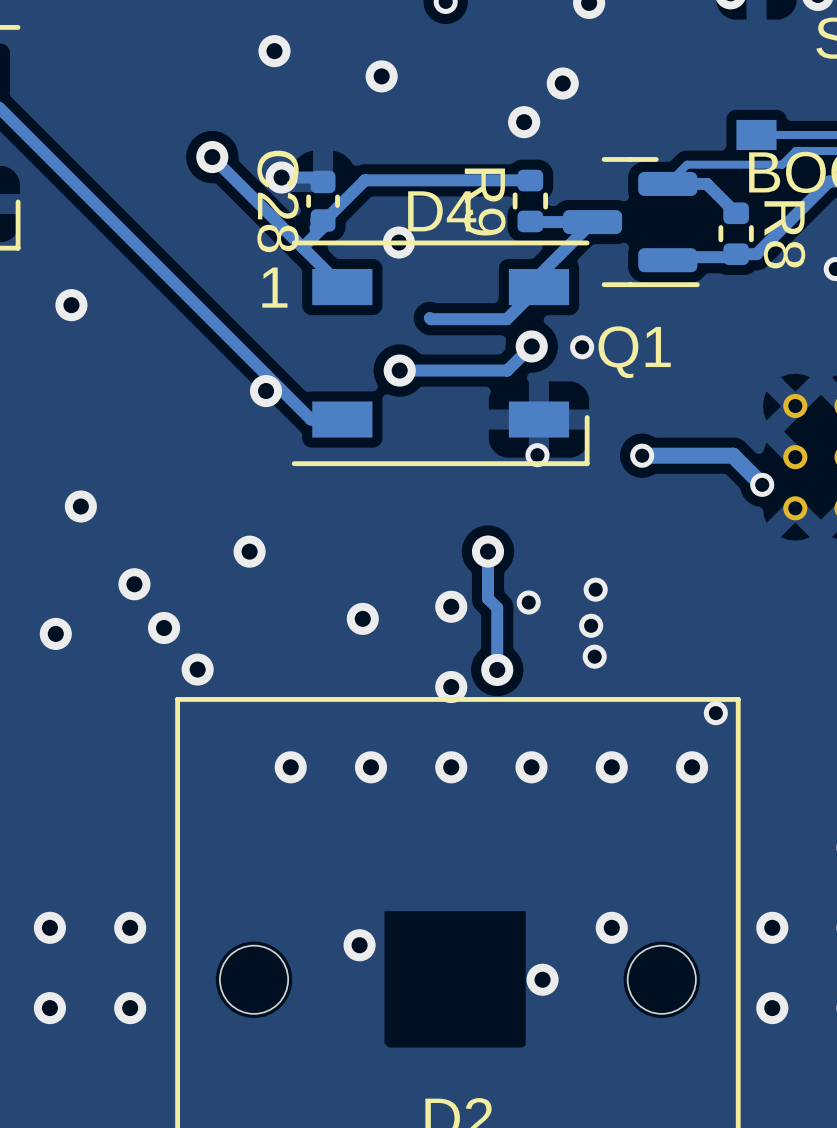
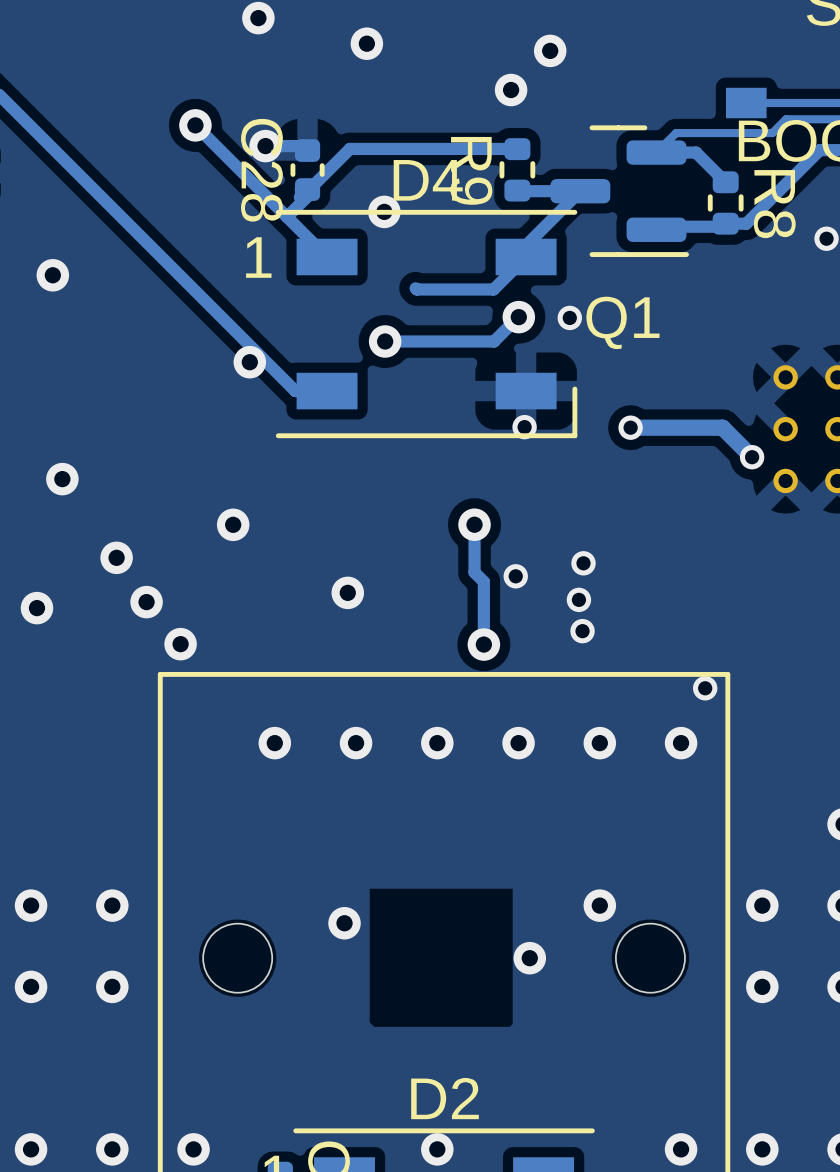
via: (451, 606) -> none
via: (451, 687) -> none

